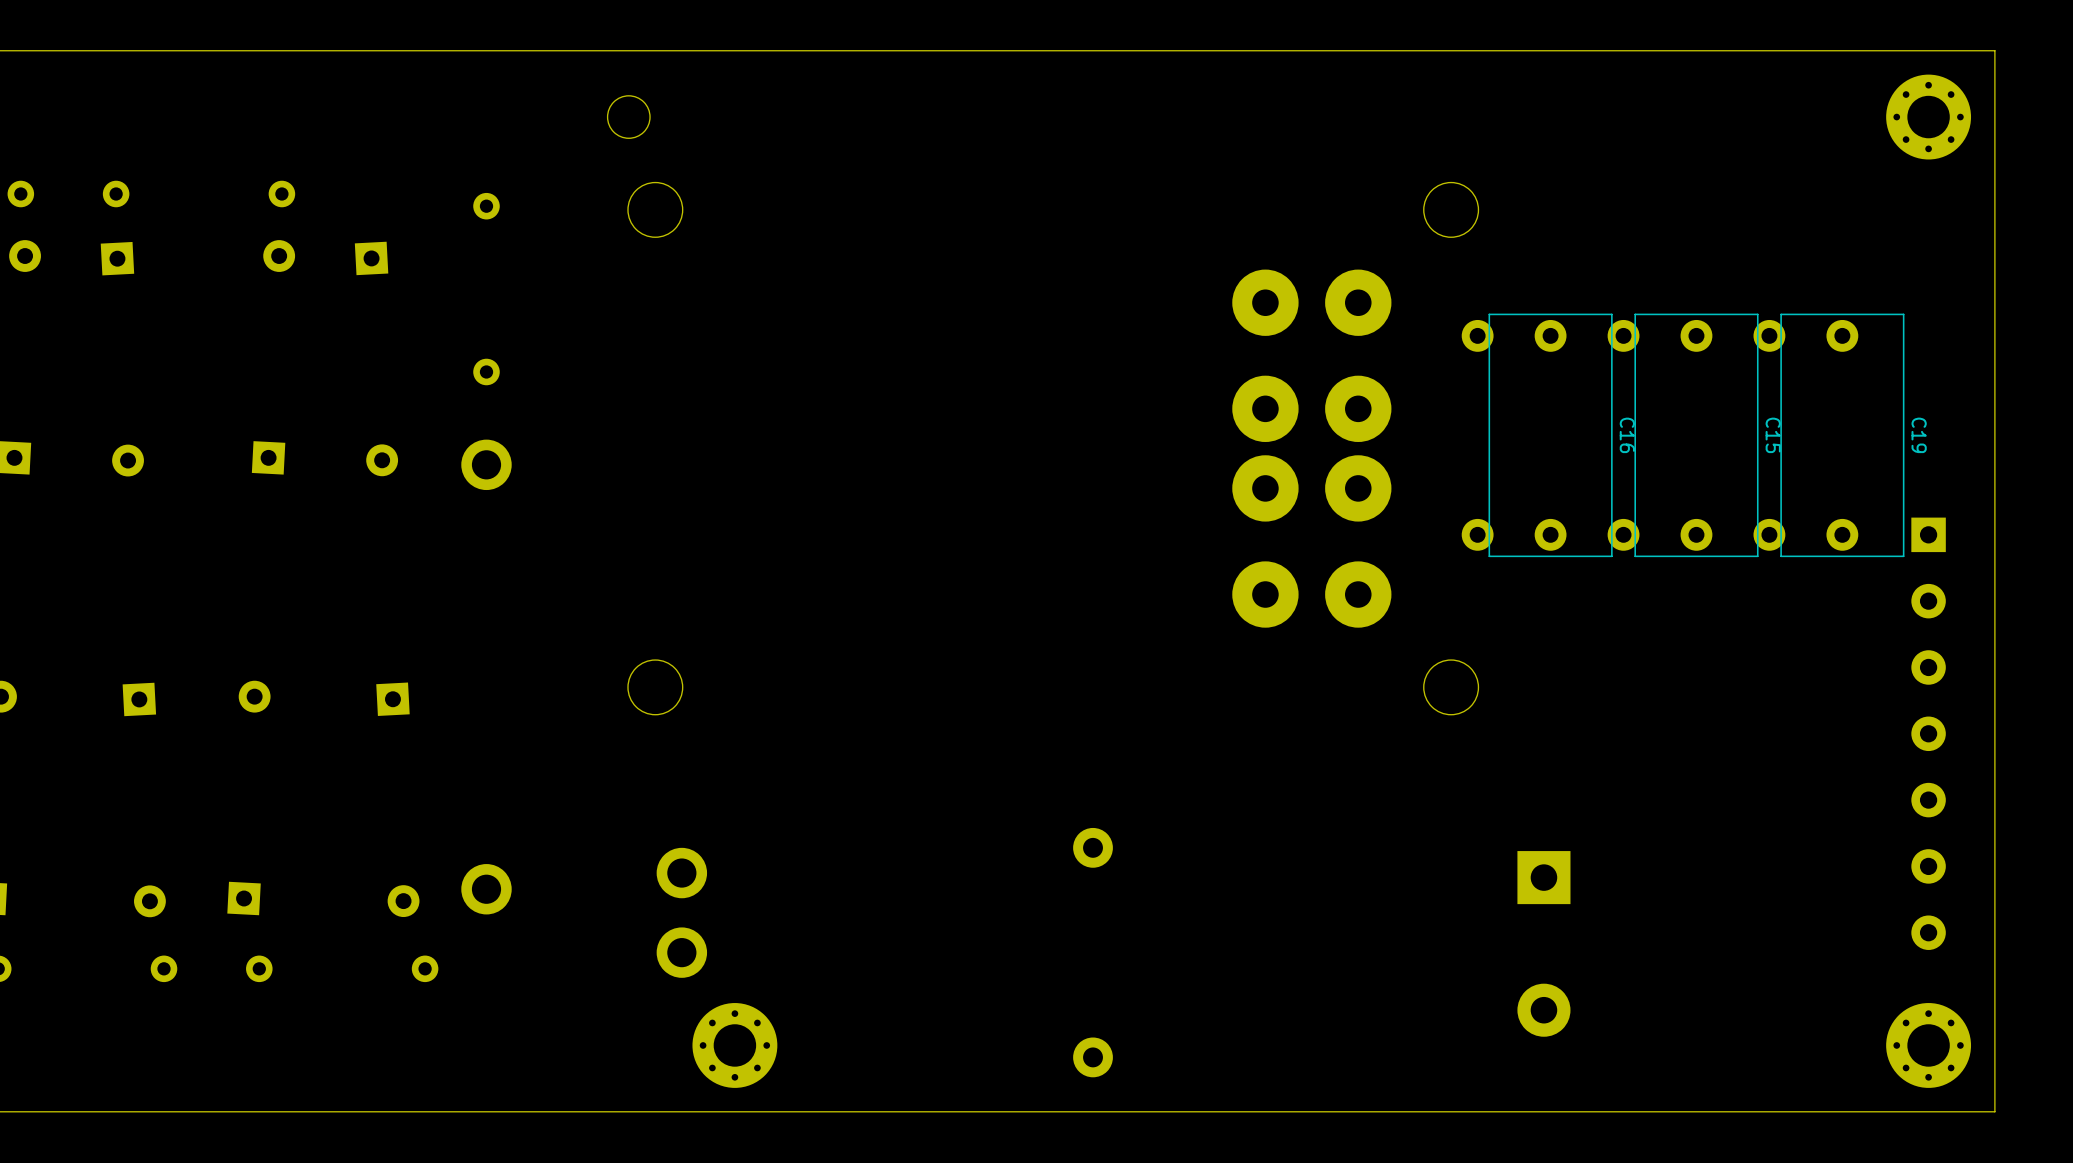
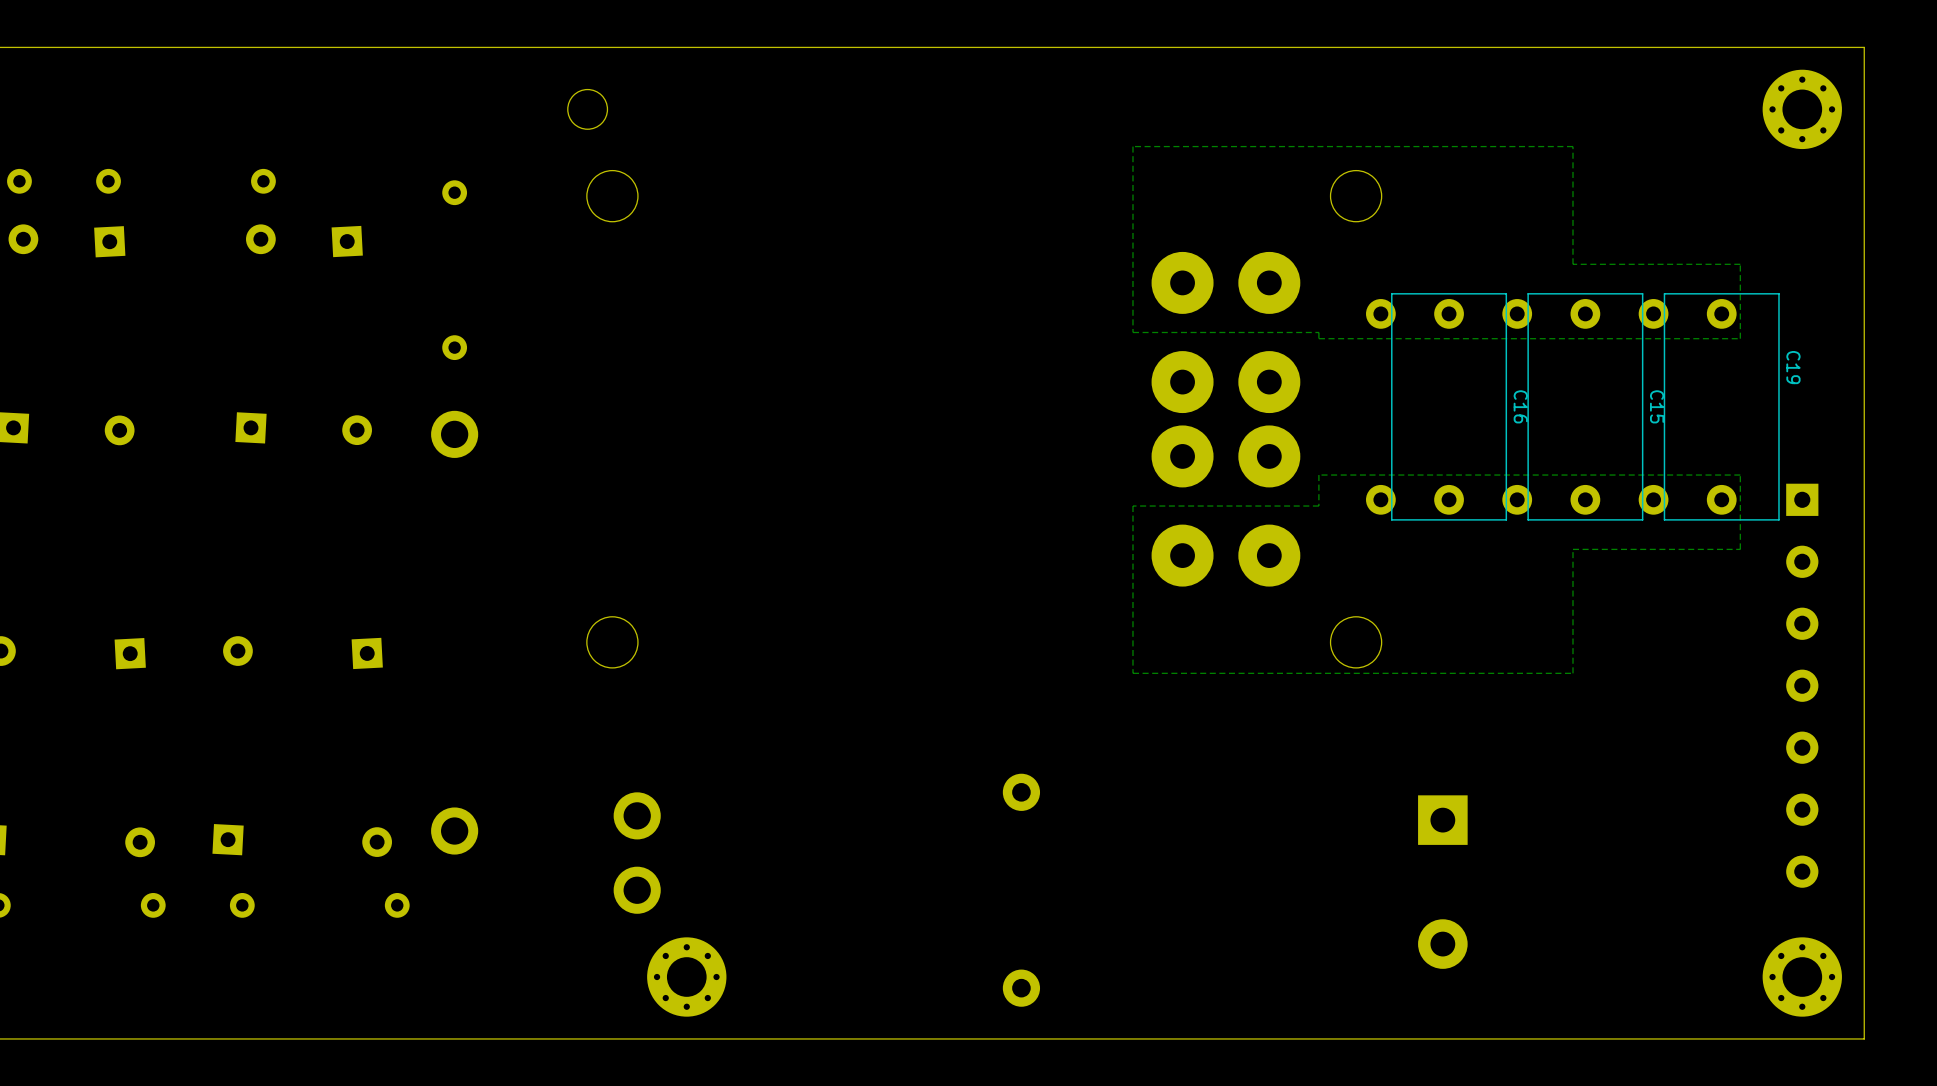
zone outline: none -> (1572, 146) (1572, 264) (1740, 264) (1740, 338) (1318, 338) (1318, 332) (1132, 332) (1132, 146) (1572, 146)
C19 name position: C19 (1919, 435) -> C19 (1793, 367)
zone outline: none -> (1740, 475) (1740, 549) (1572, 549) (1572, 673) (1132, 673) (1132, 506) (1318, 506) (1318, 475) (1740, 475)

